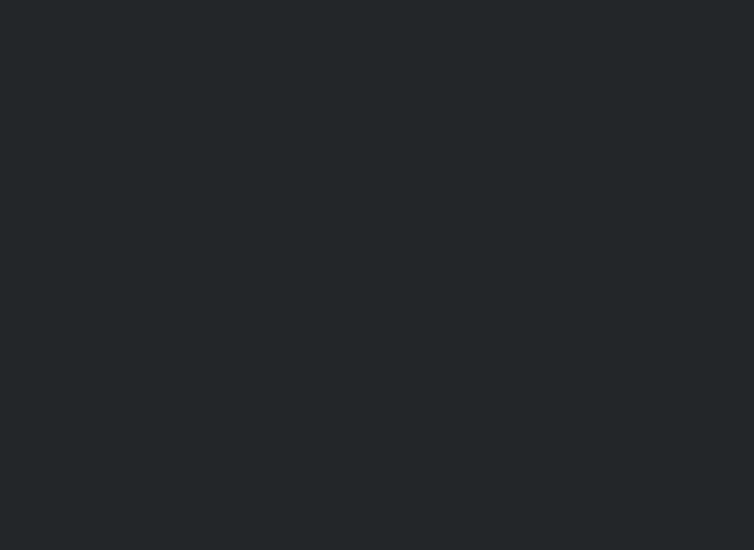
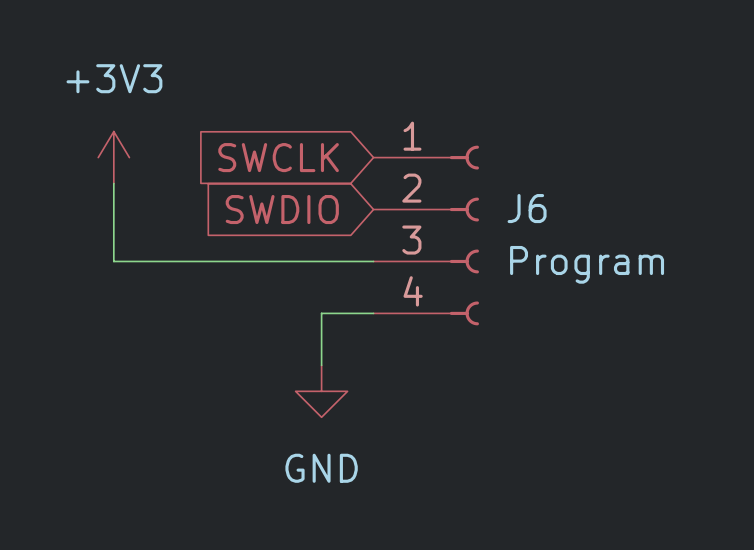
power symbol: none -> +3V3 (113, 157)
global label: none -> SWCLK (278, 157)
wire: none -> (113, 183) (113, 261) (373, 261)
global label: none -> SWDIO (282, 209)
J6: none -> Program (426, 235)
wire: none -> (373, 313) (321, 313) (321, 365)
power symbol: none -> GND (321, 391)

